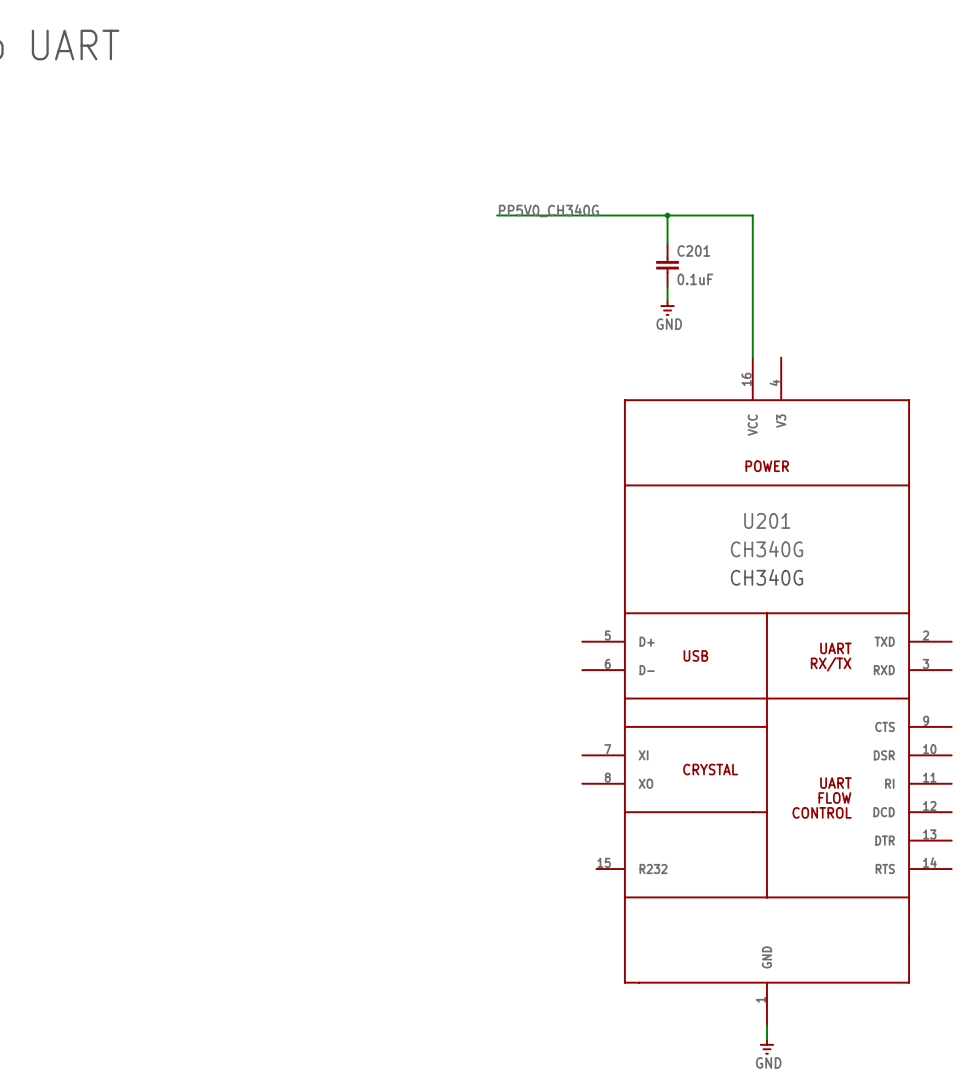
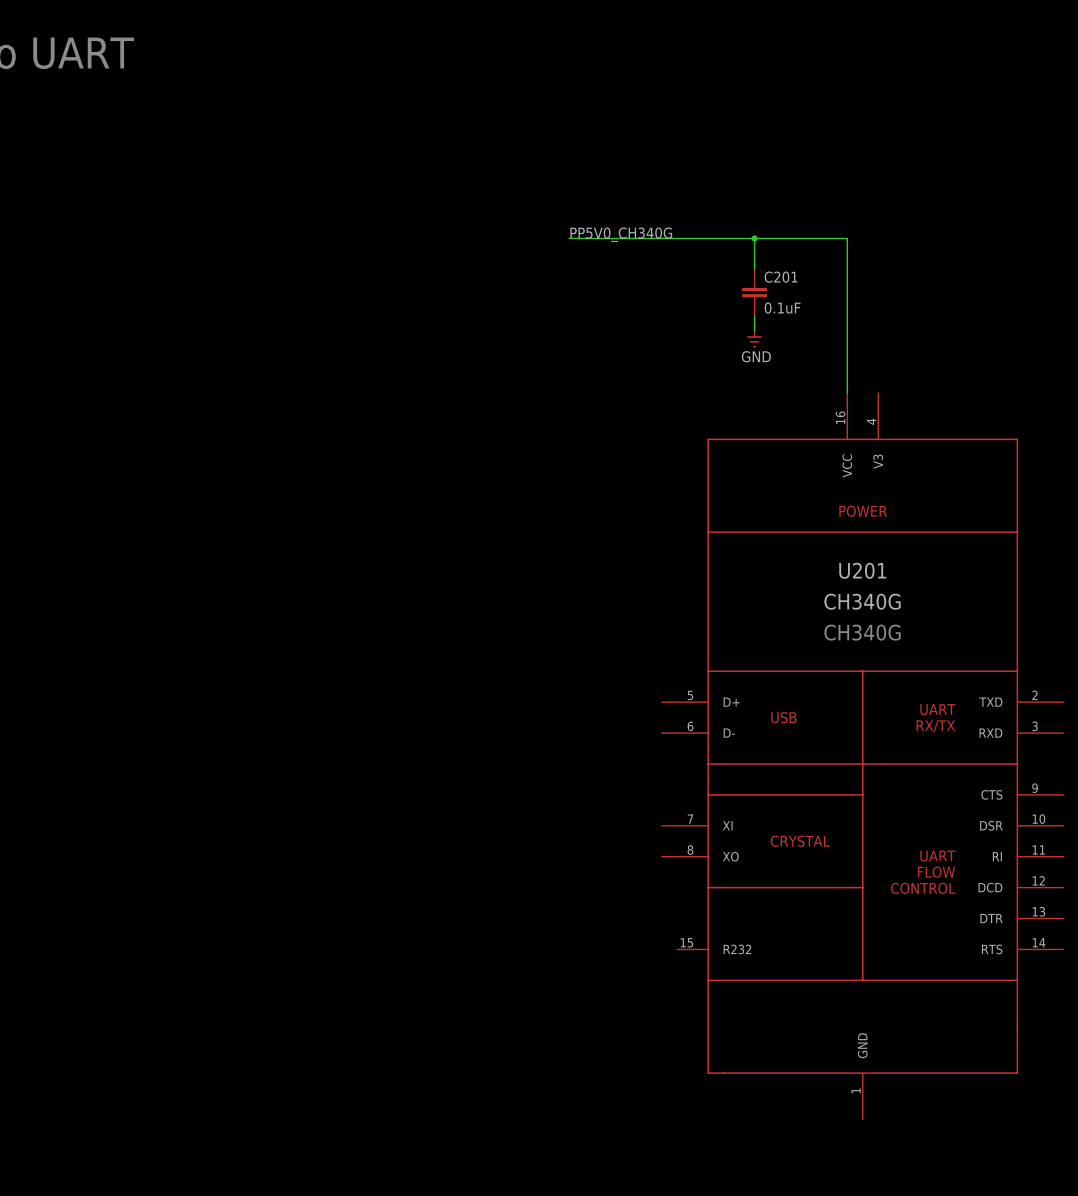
wire: (766, 1025) (766, 1039) -> none
power symbol: GND (766, 1046) -> none

